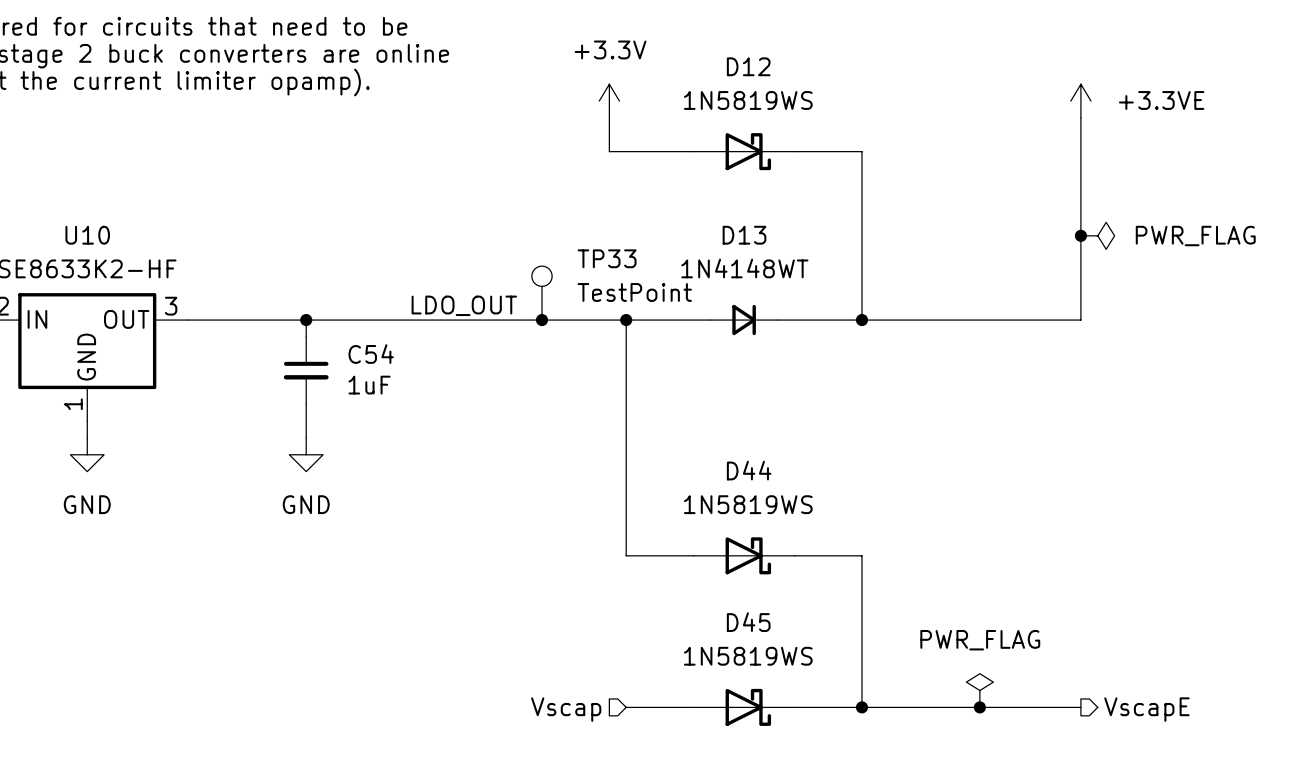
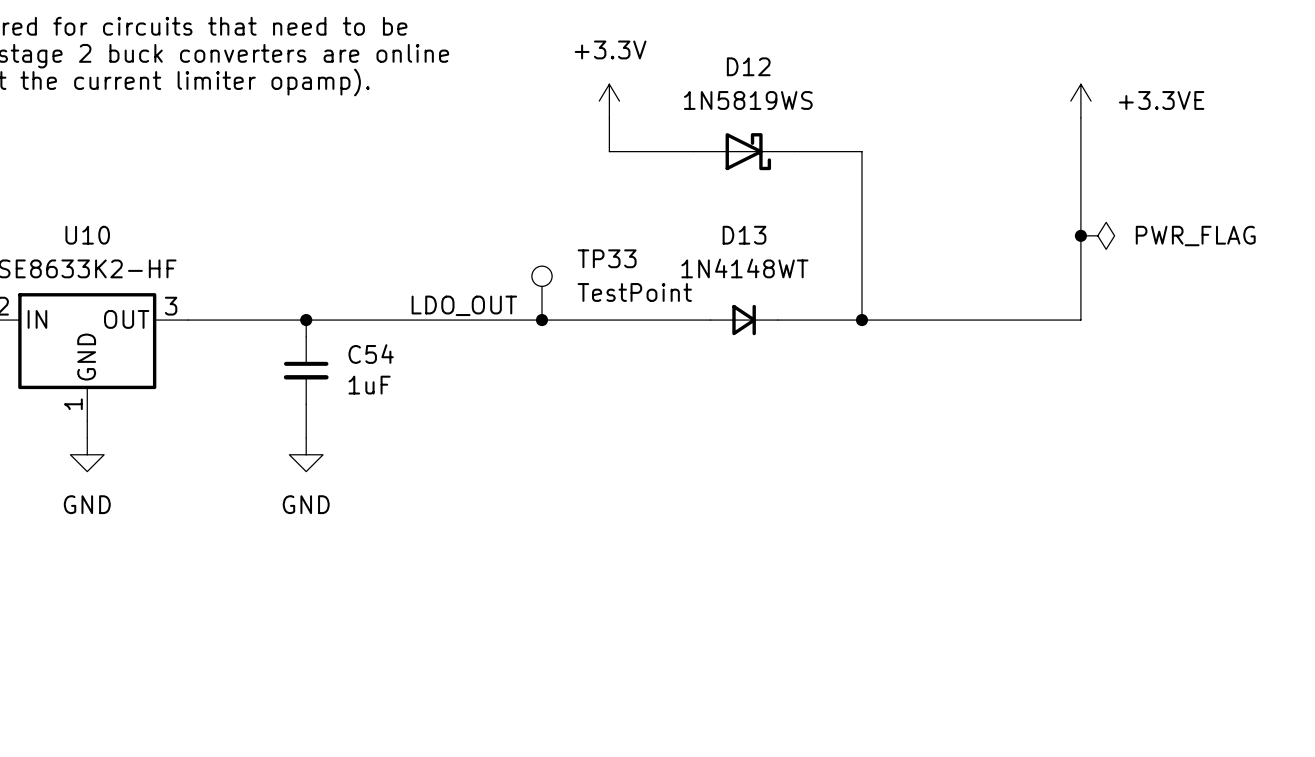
wire: (626, 320) (626, 555) (693, 555) -> none
junction: (626, 320) -> none
D44: 1N5819WS (744, 555) -> none
wire: (794, 555) (861, 555) (861, 707) -> none
power symbol: PWR_FLAG (979, 690) -> none
wire: (626, 707) (693, 707) -> none
D45: 1N5819WS (744, 707) -> none
wire: (794, 707) (1080, 707) -> none
junction: (861, 707) -> none
junction: (979, 707) -> none
hierarchical label: Vscap (566, 709) -> none
hierarchical label: VscapE (1146, 709) -> none

